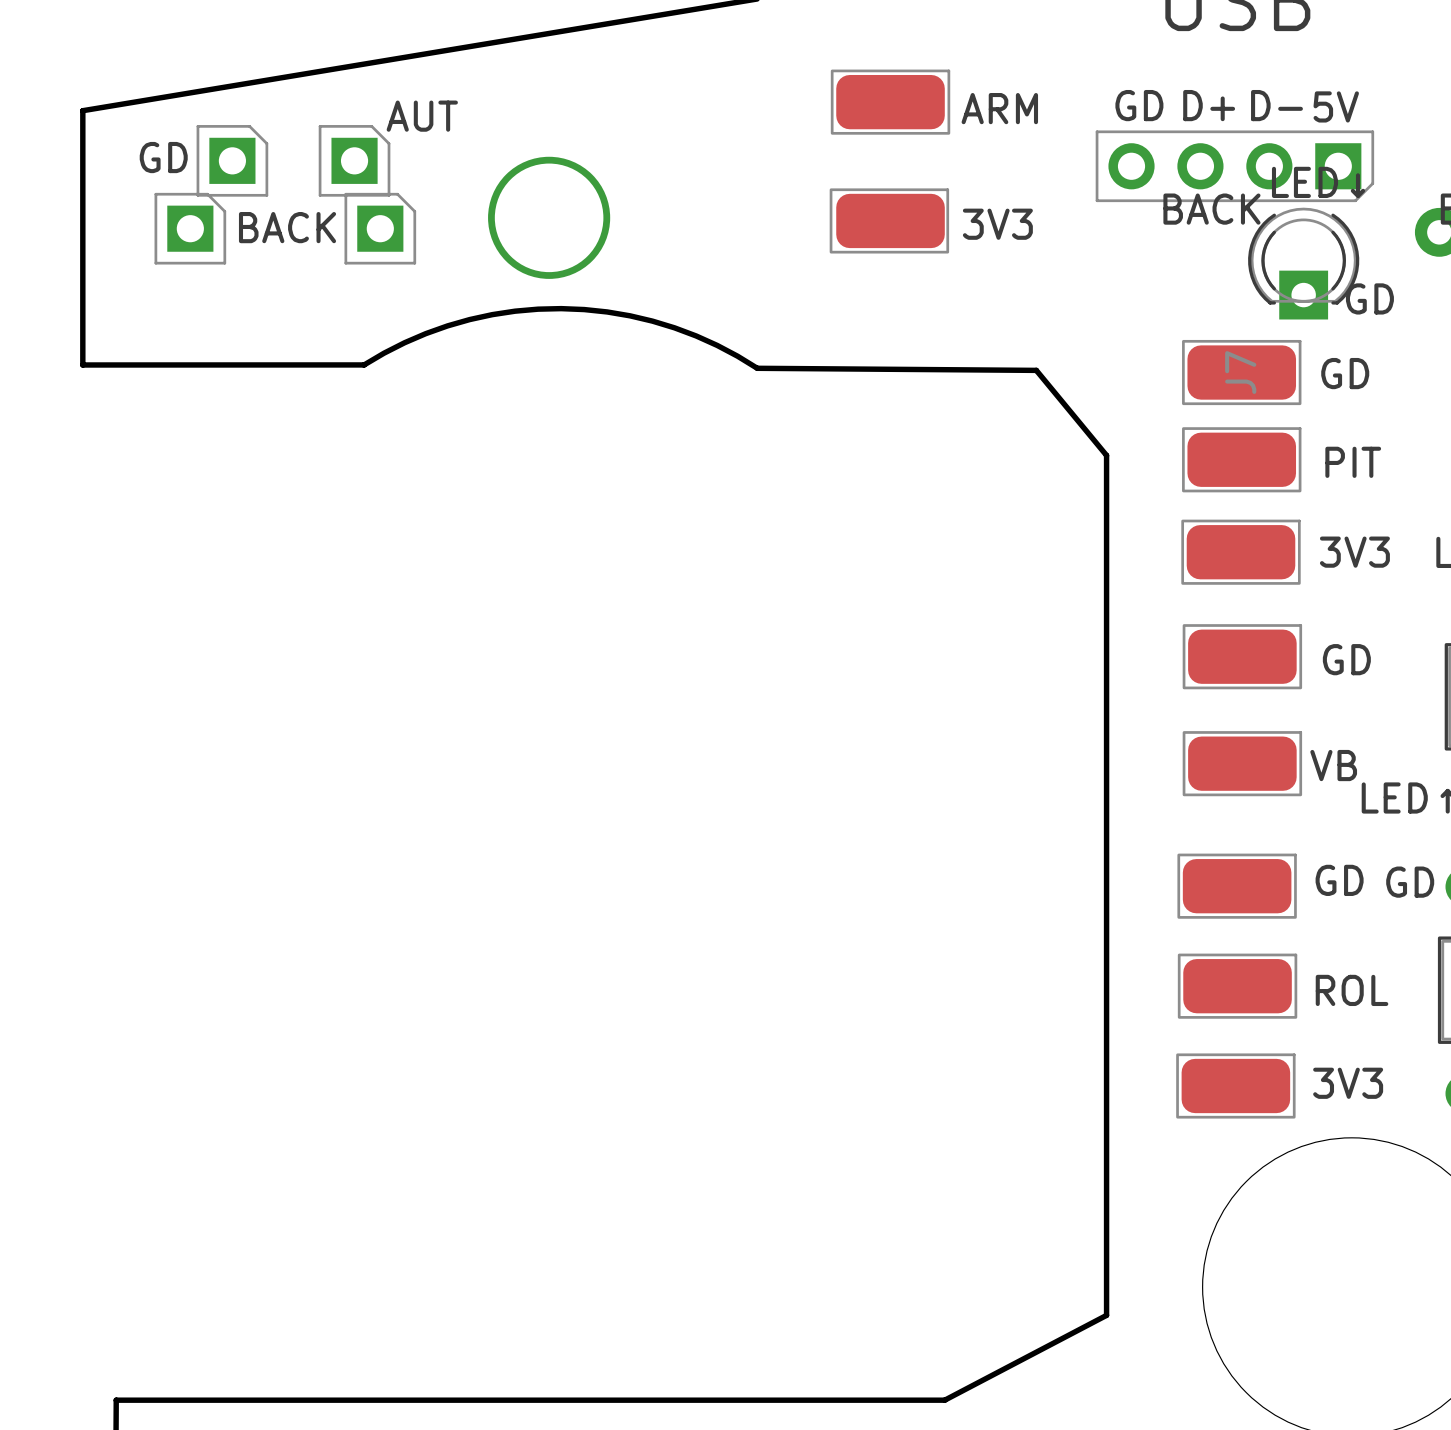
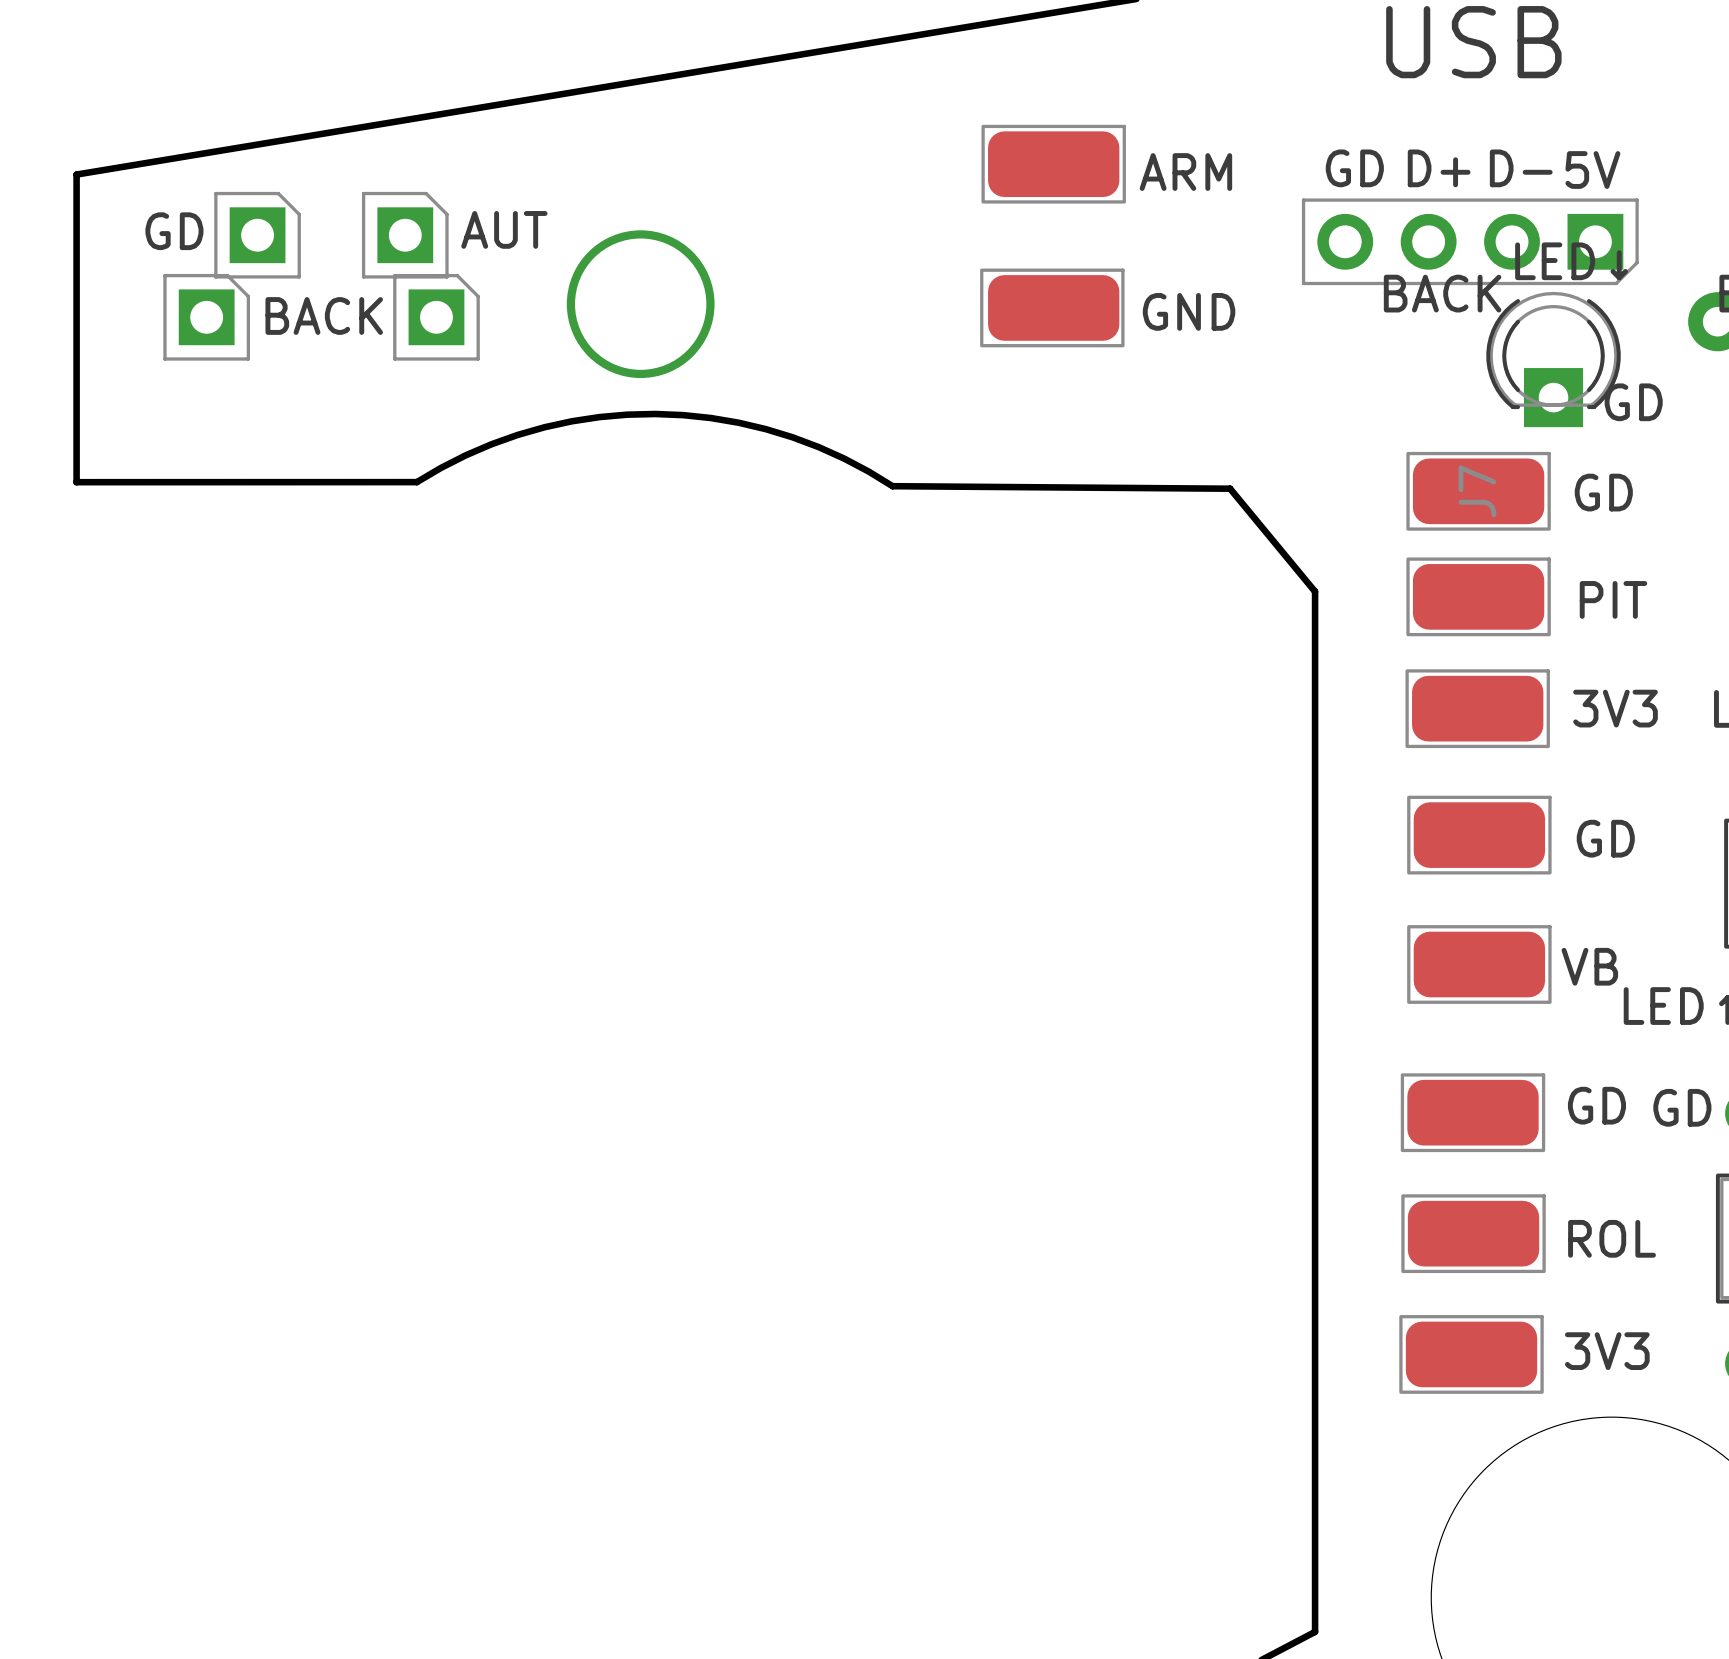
text position: AUT (422, 116) -> AUT (504, 229)
text: 3V3 (997, 224) -> GND (1189, 311)

